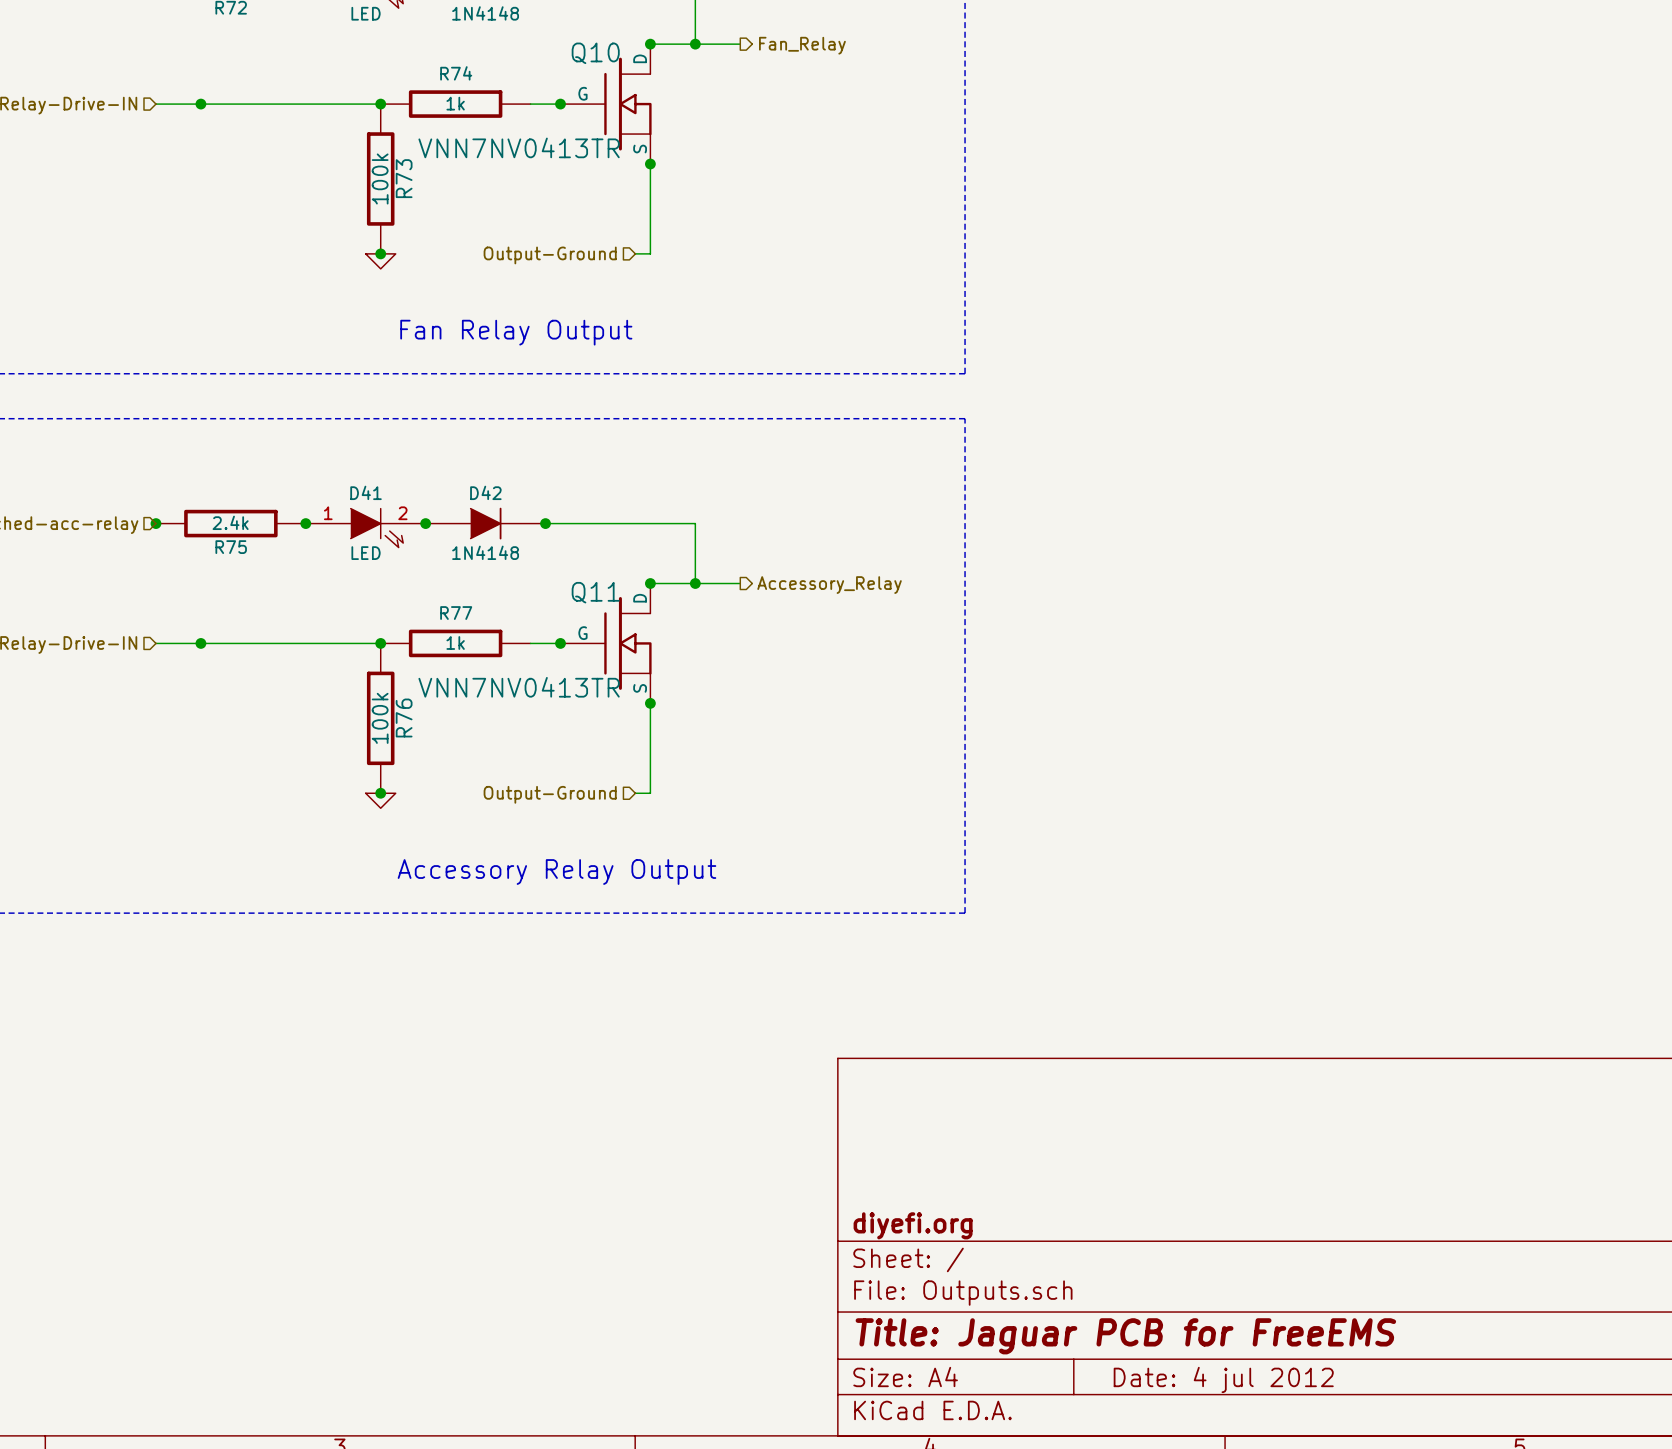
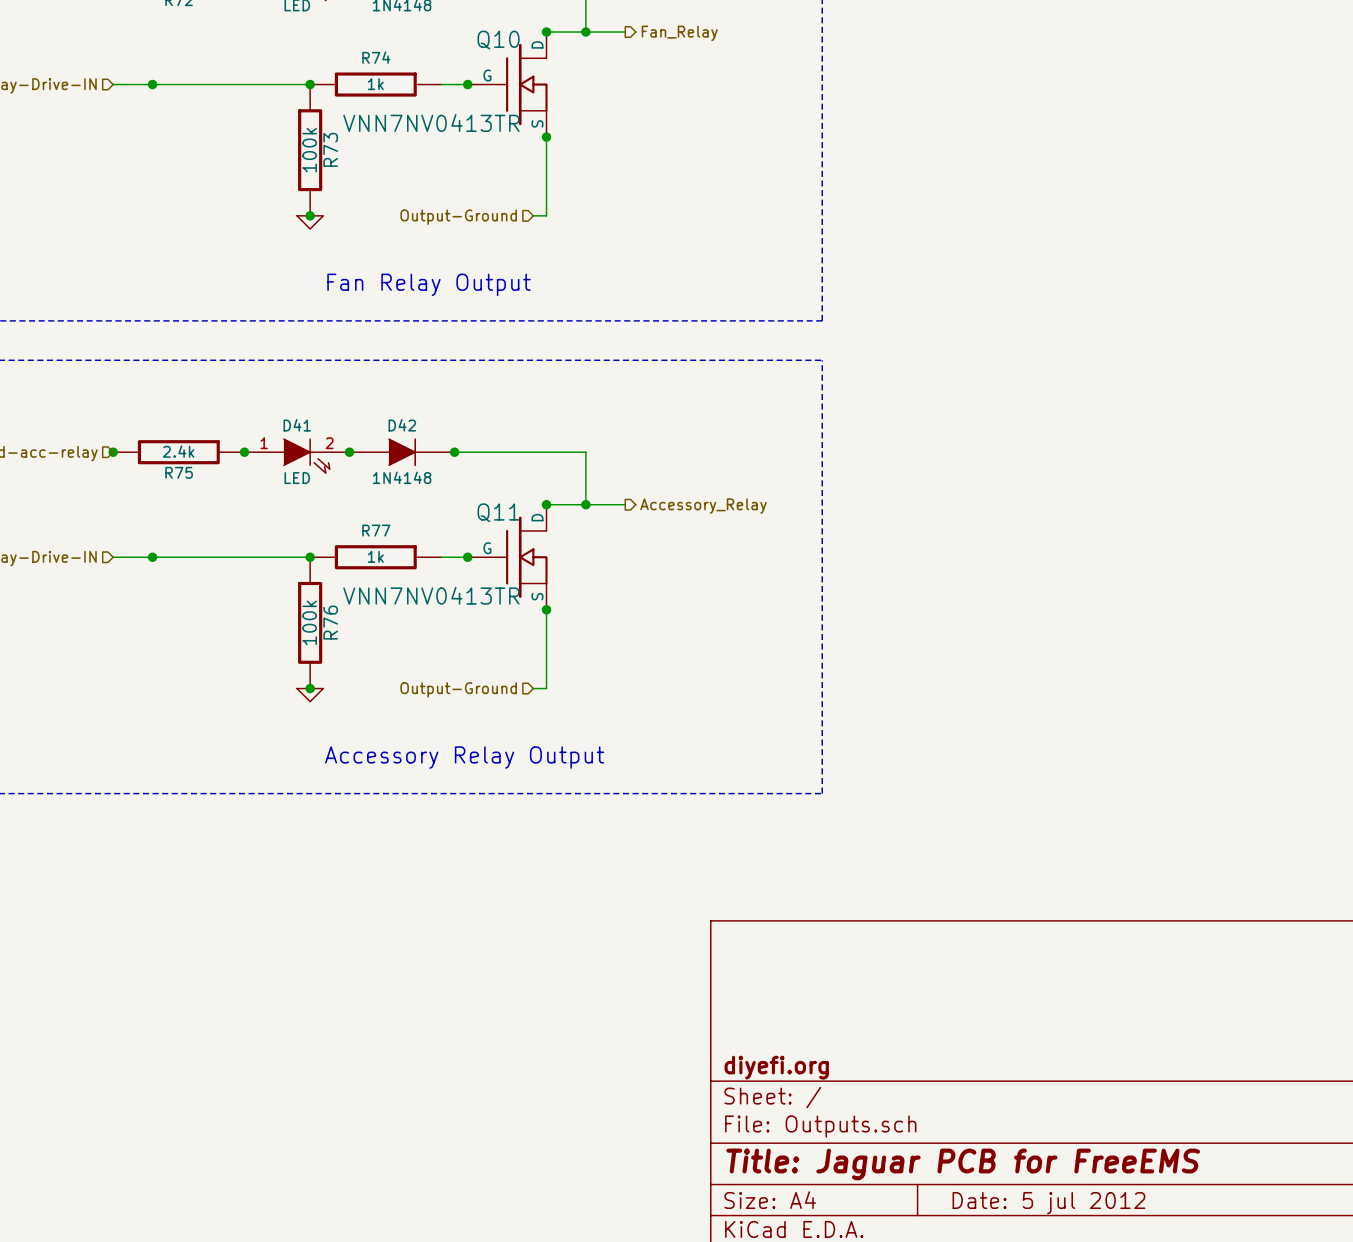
title block: Date: 4 jul 2012 (1223, 1379) -> Date: 5 jul 2012 (1048, 1203)

